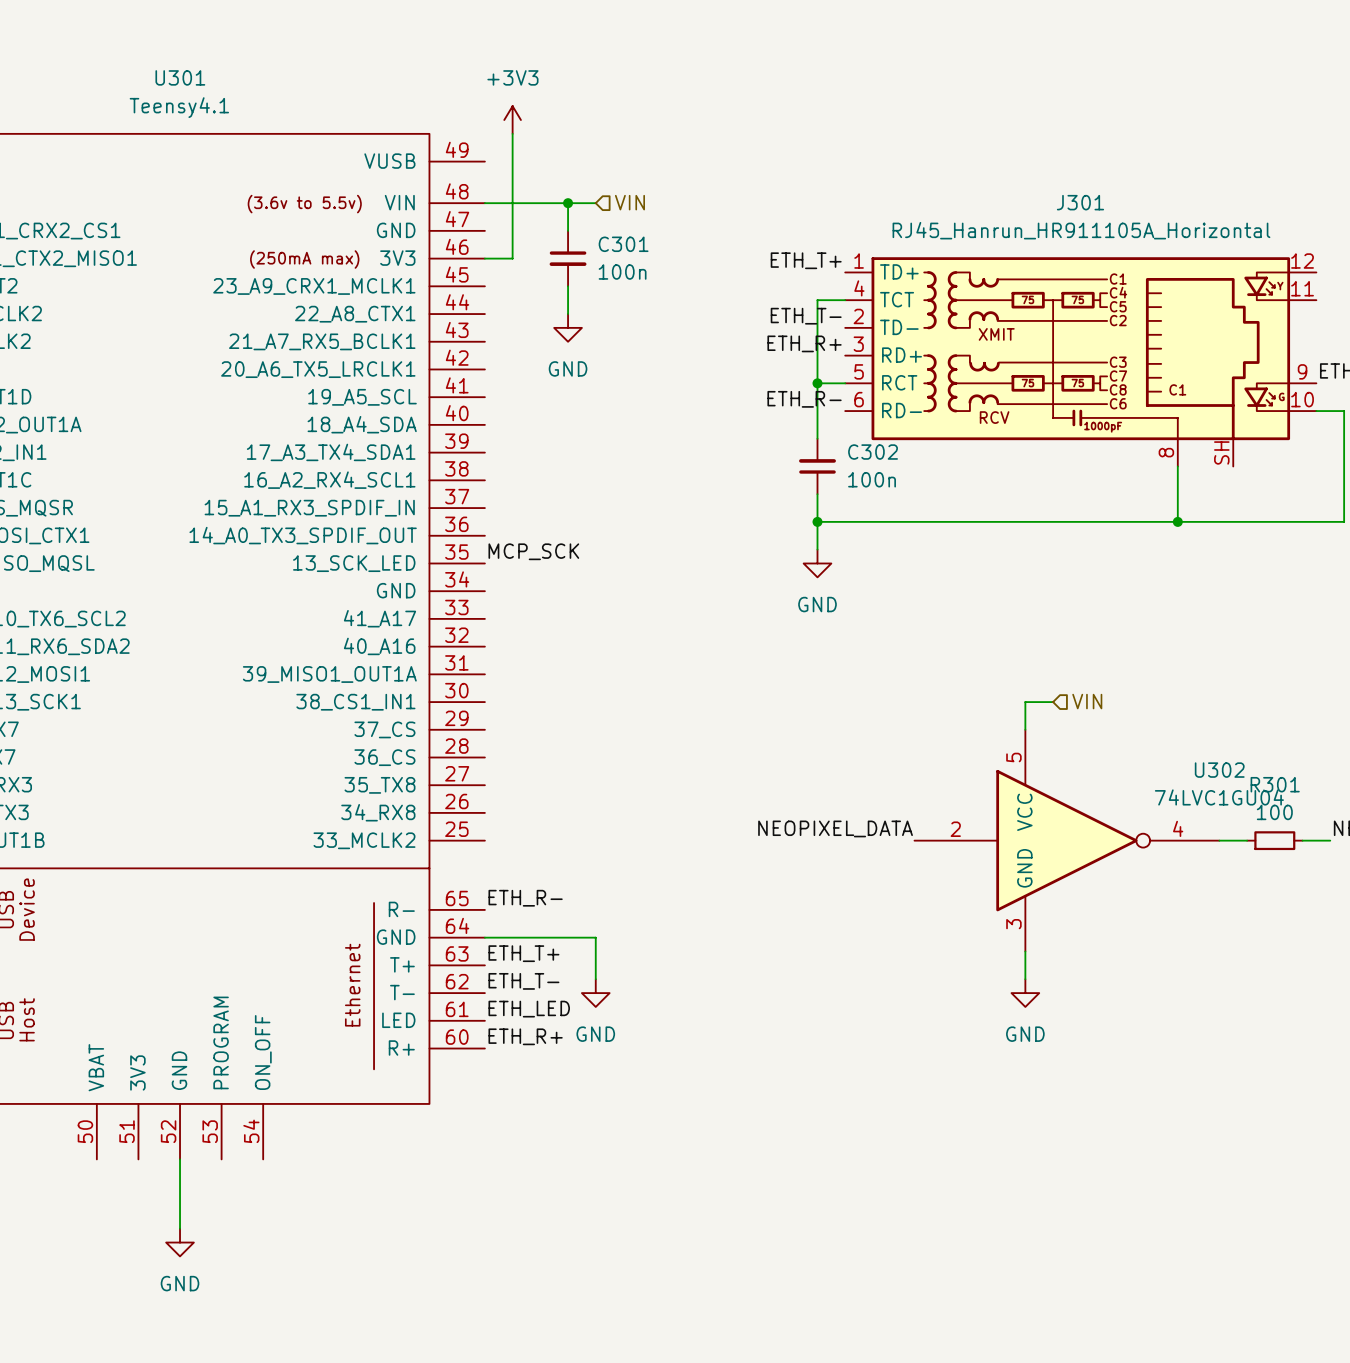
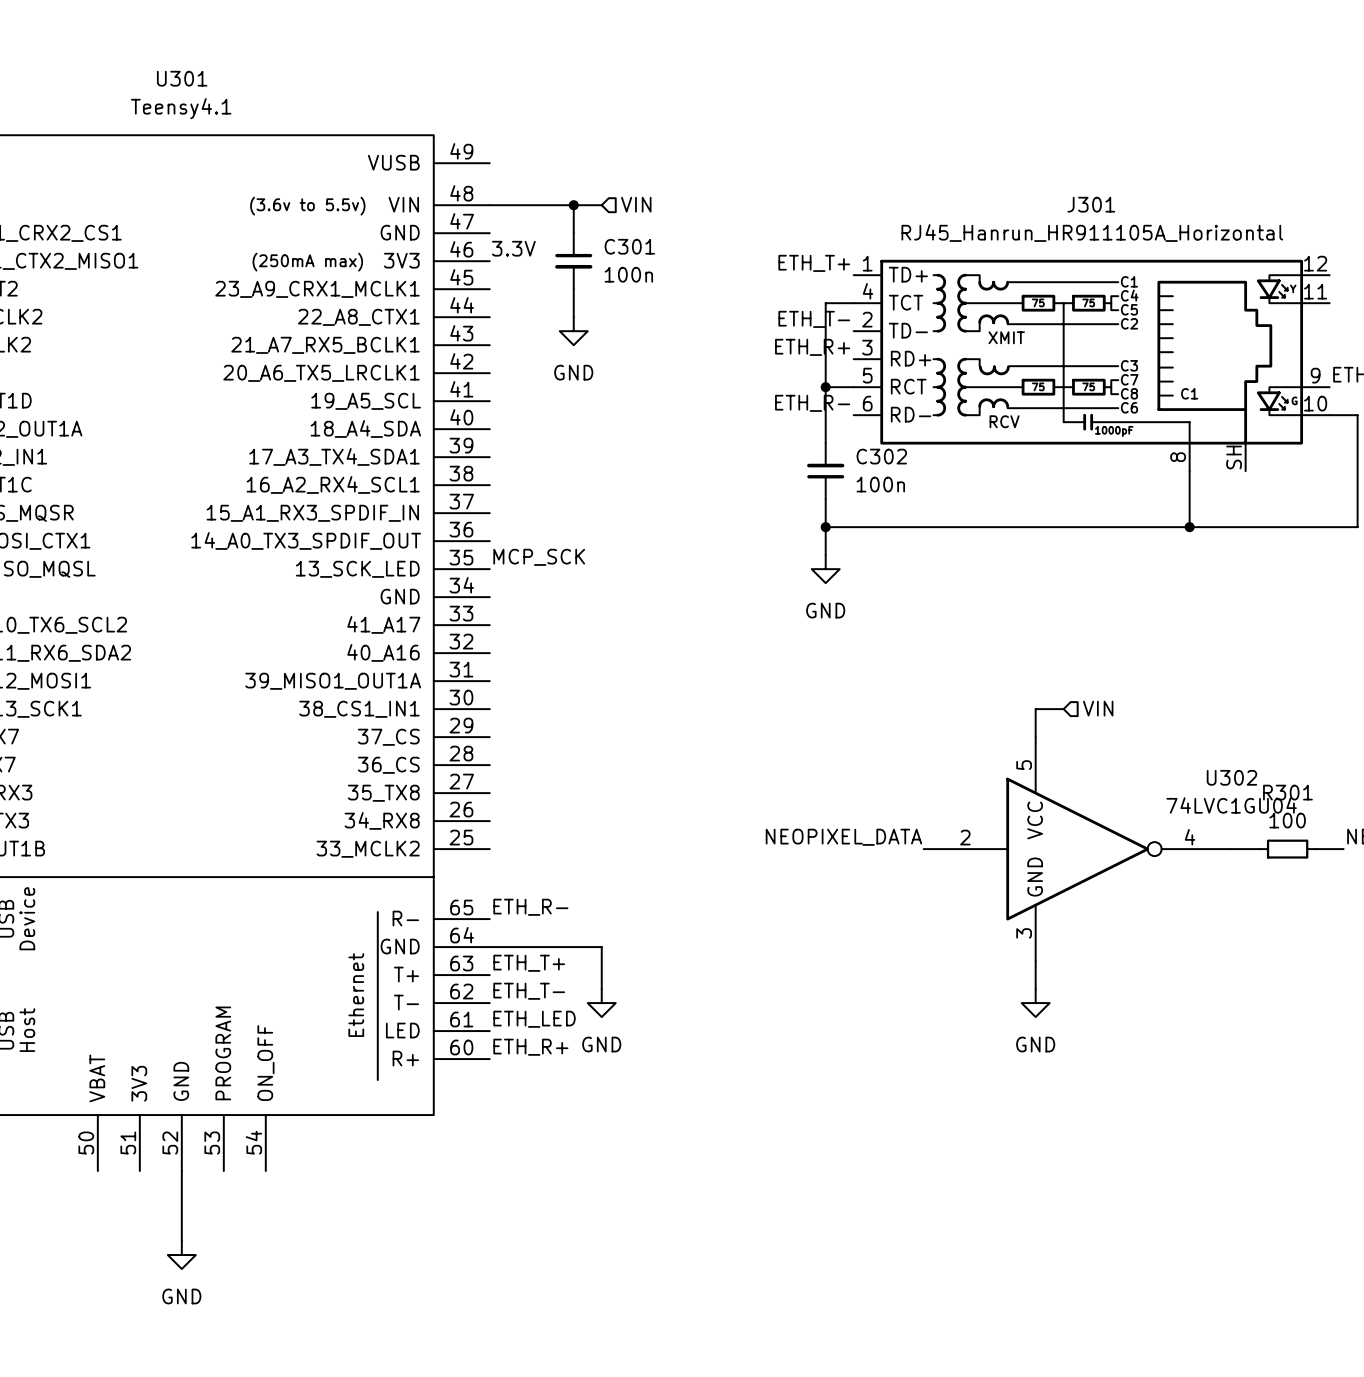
power symbol: +3V3 (512, 120) -> none
wire: (512, 133) (512, 258) (484, 258) -> none
label: none -> 3.3V (513, 248)

